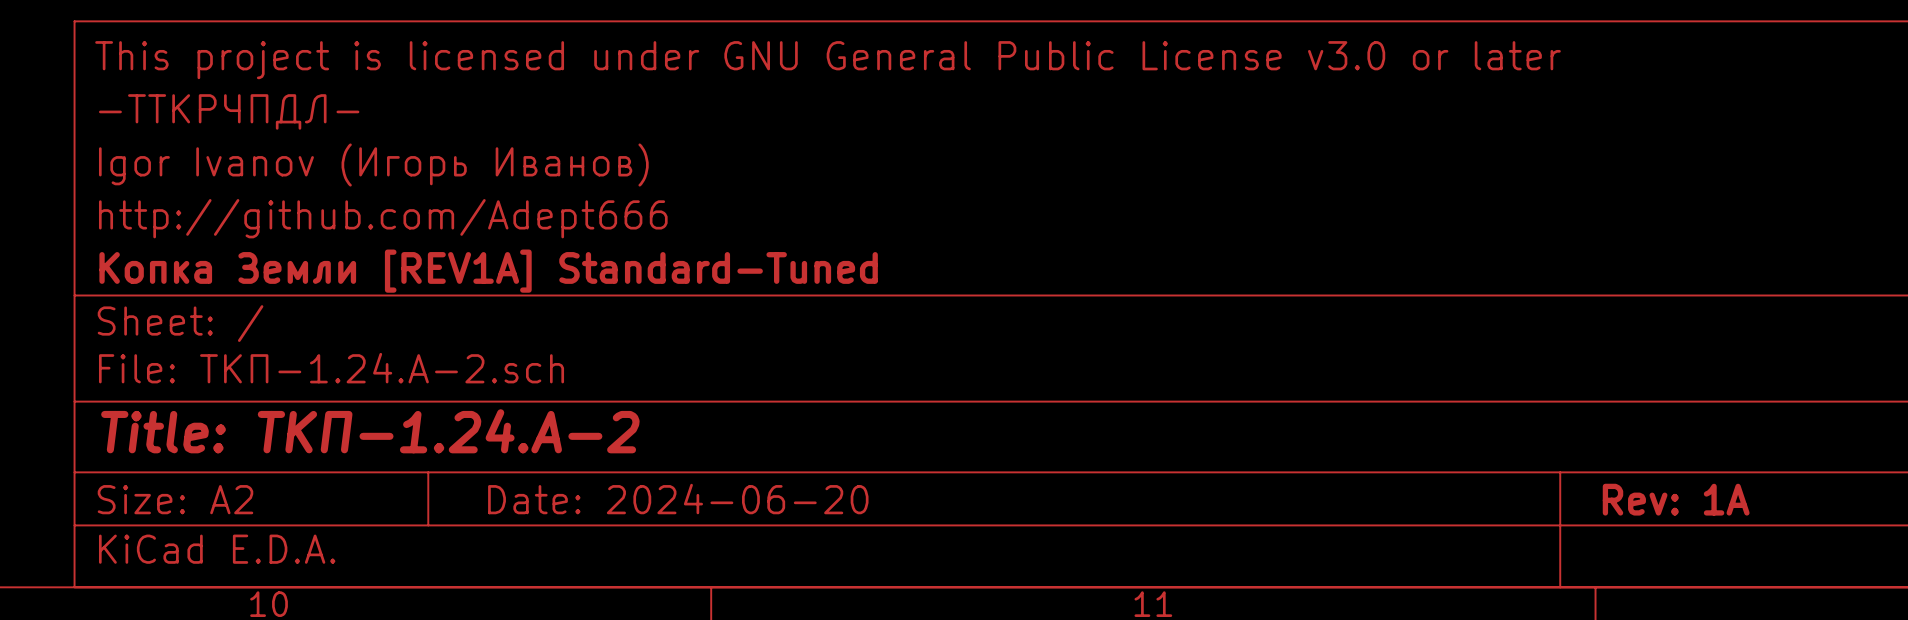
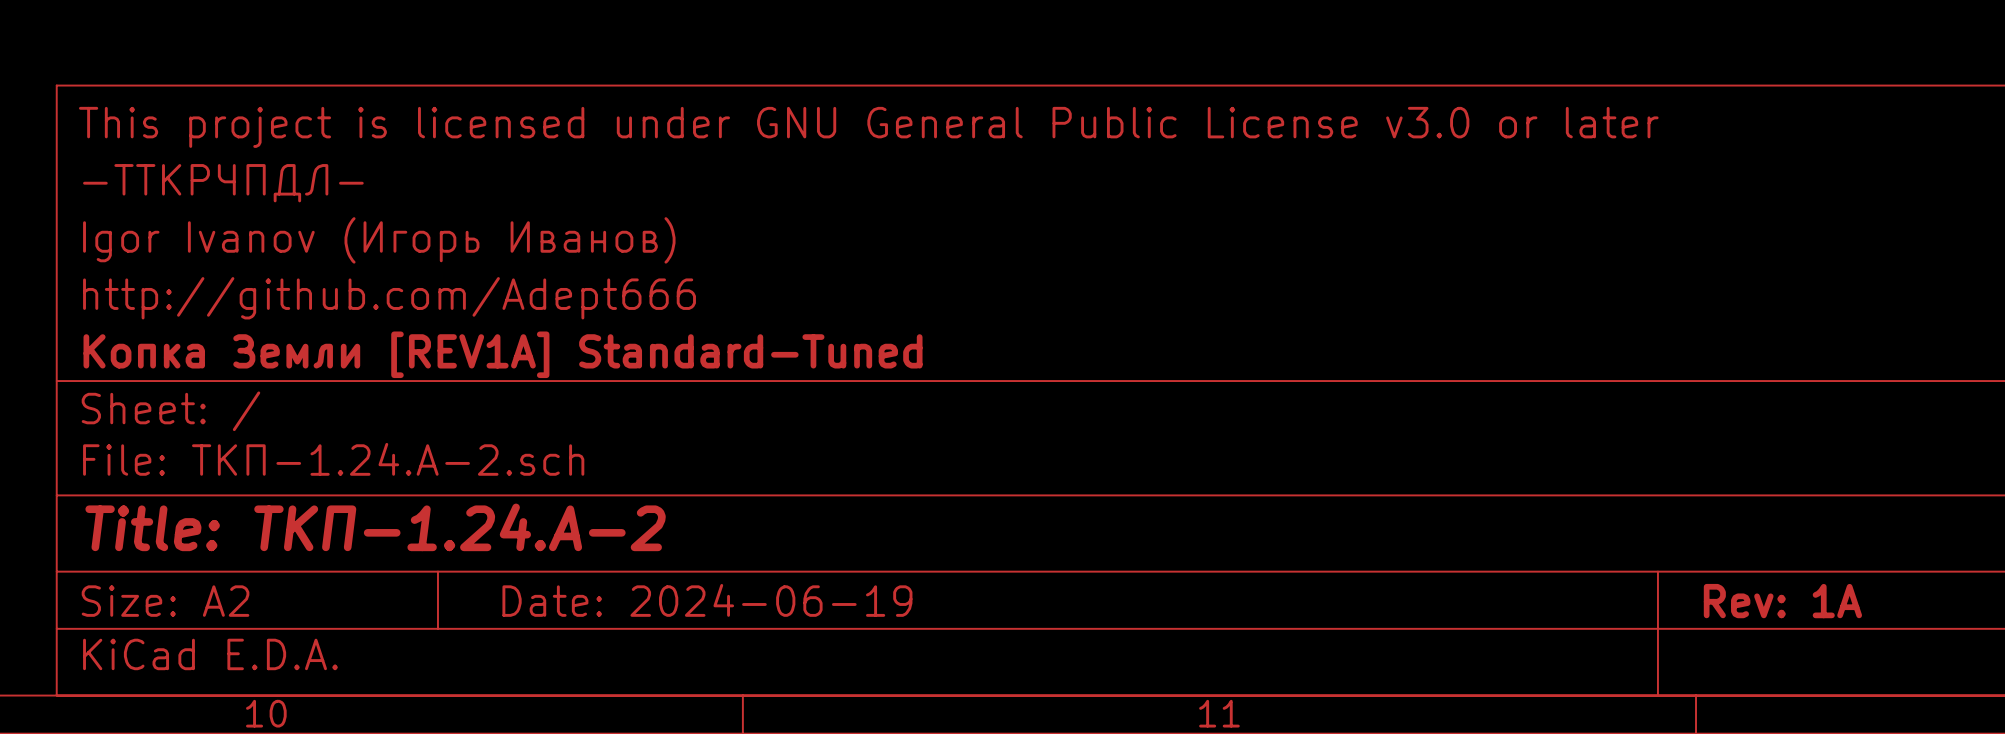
title block: Date: 2024-06-20 (678, 499) -> Date: 2024-06-19 (707, 600)

